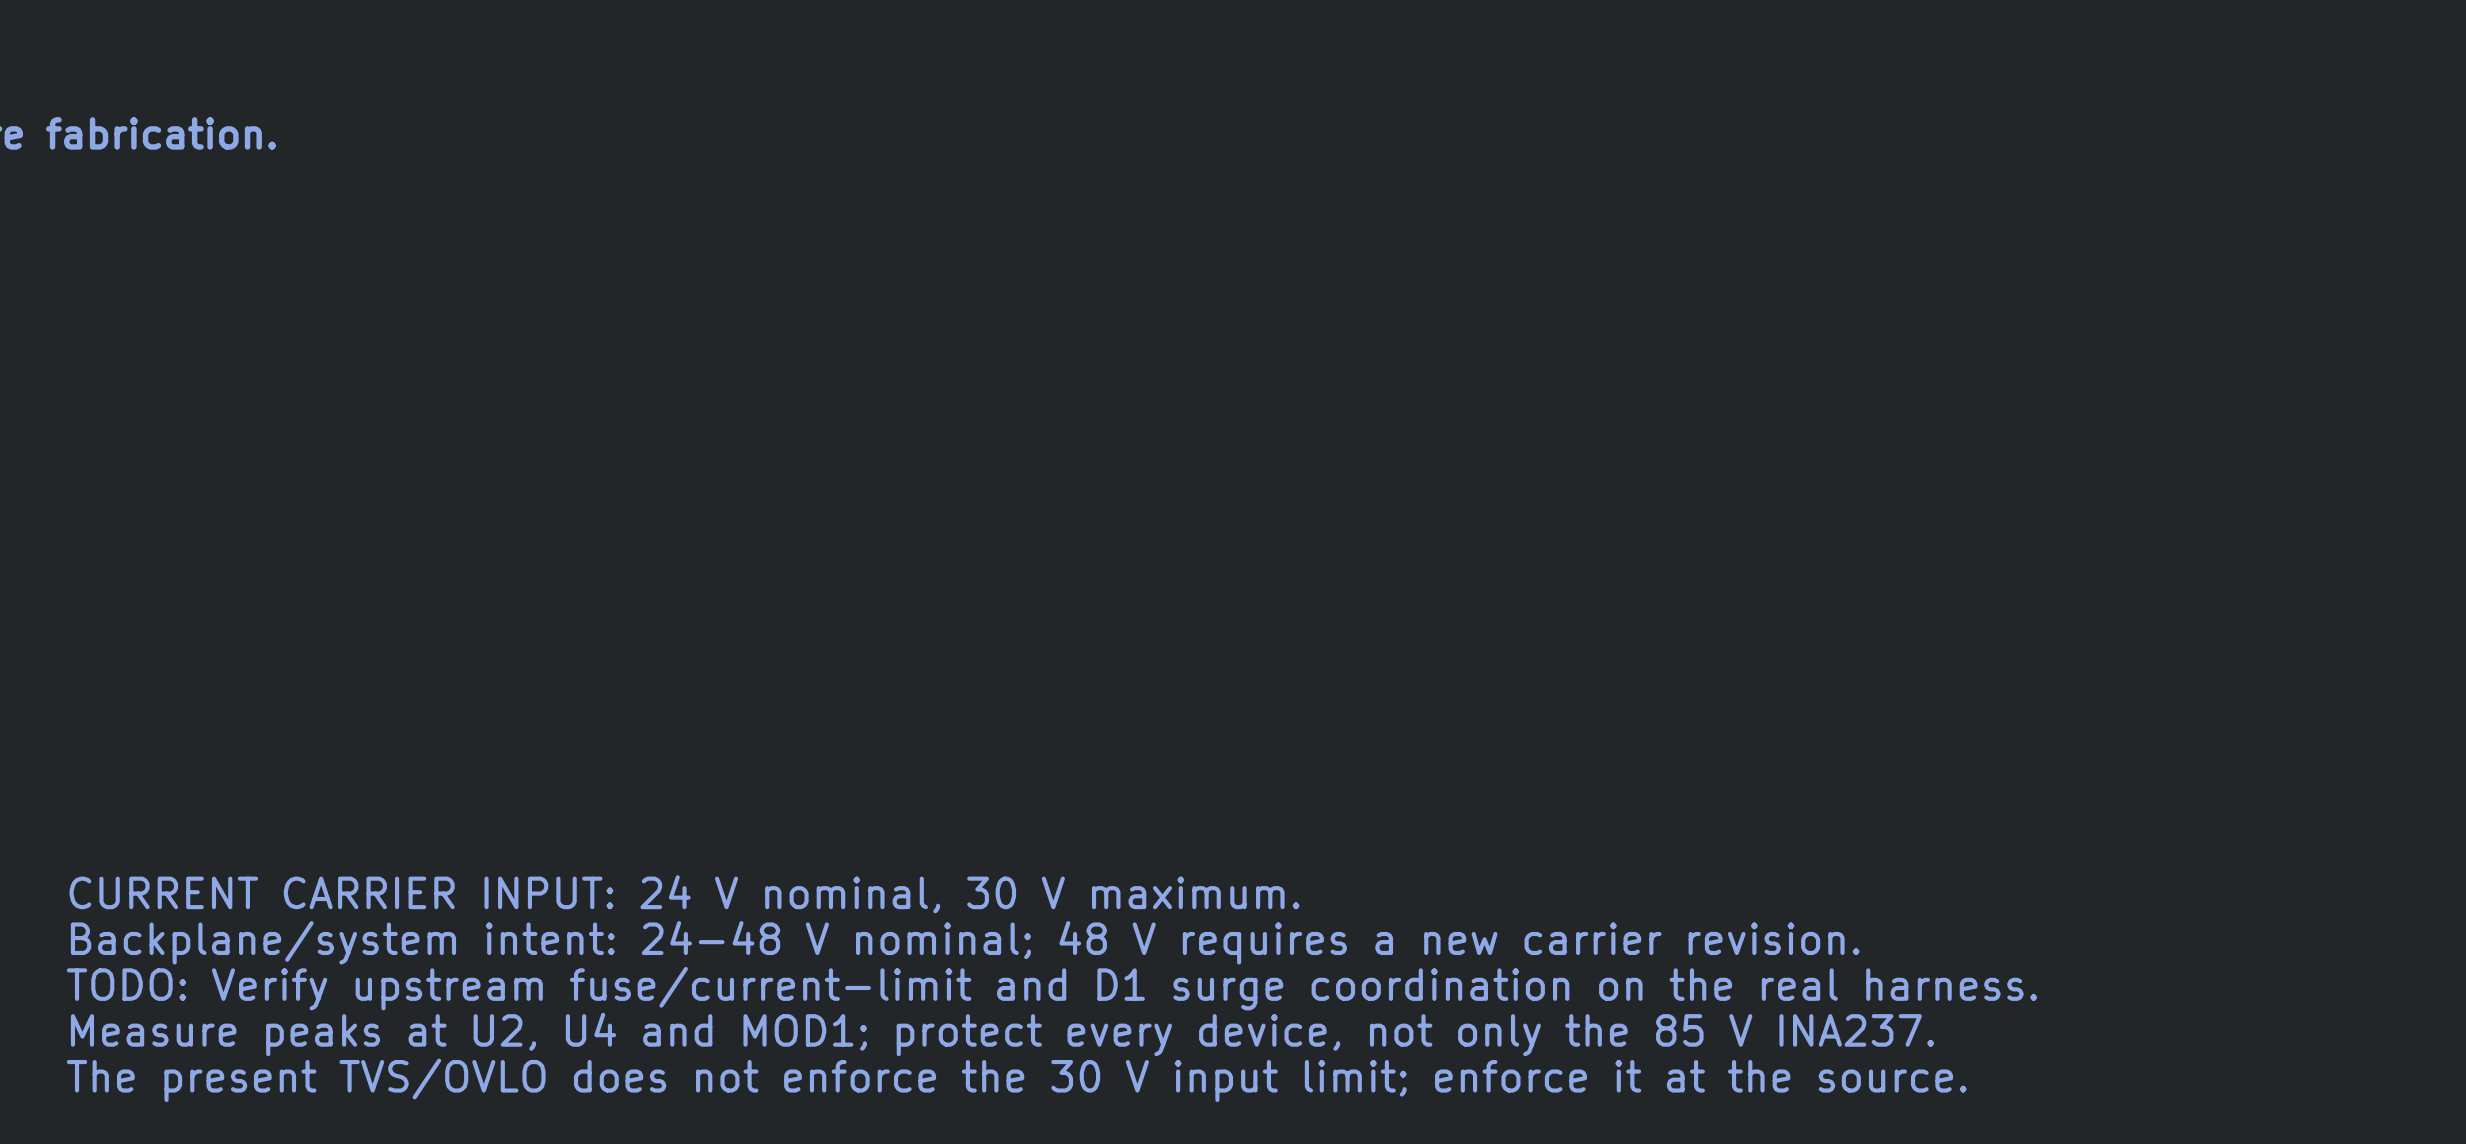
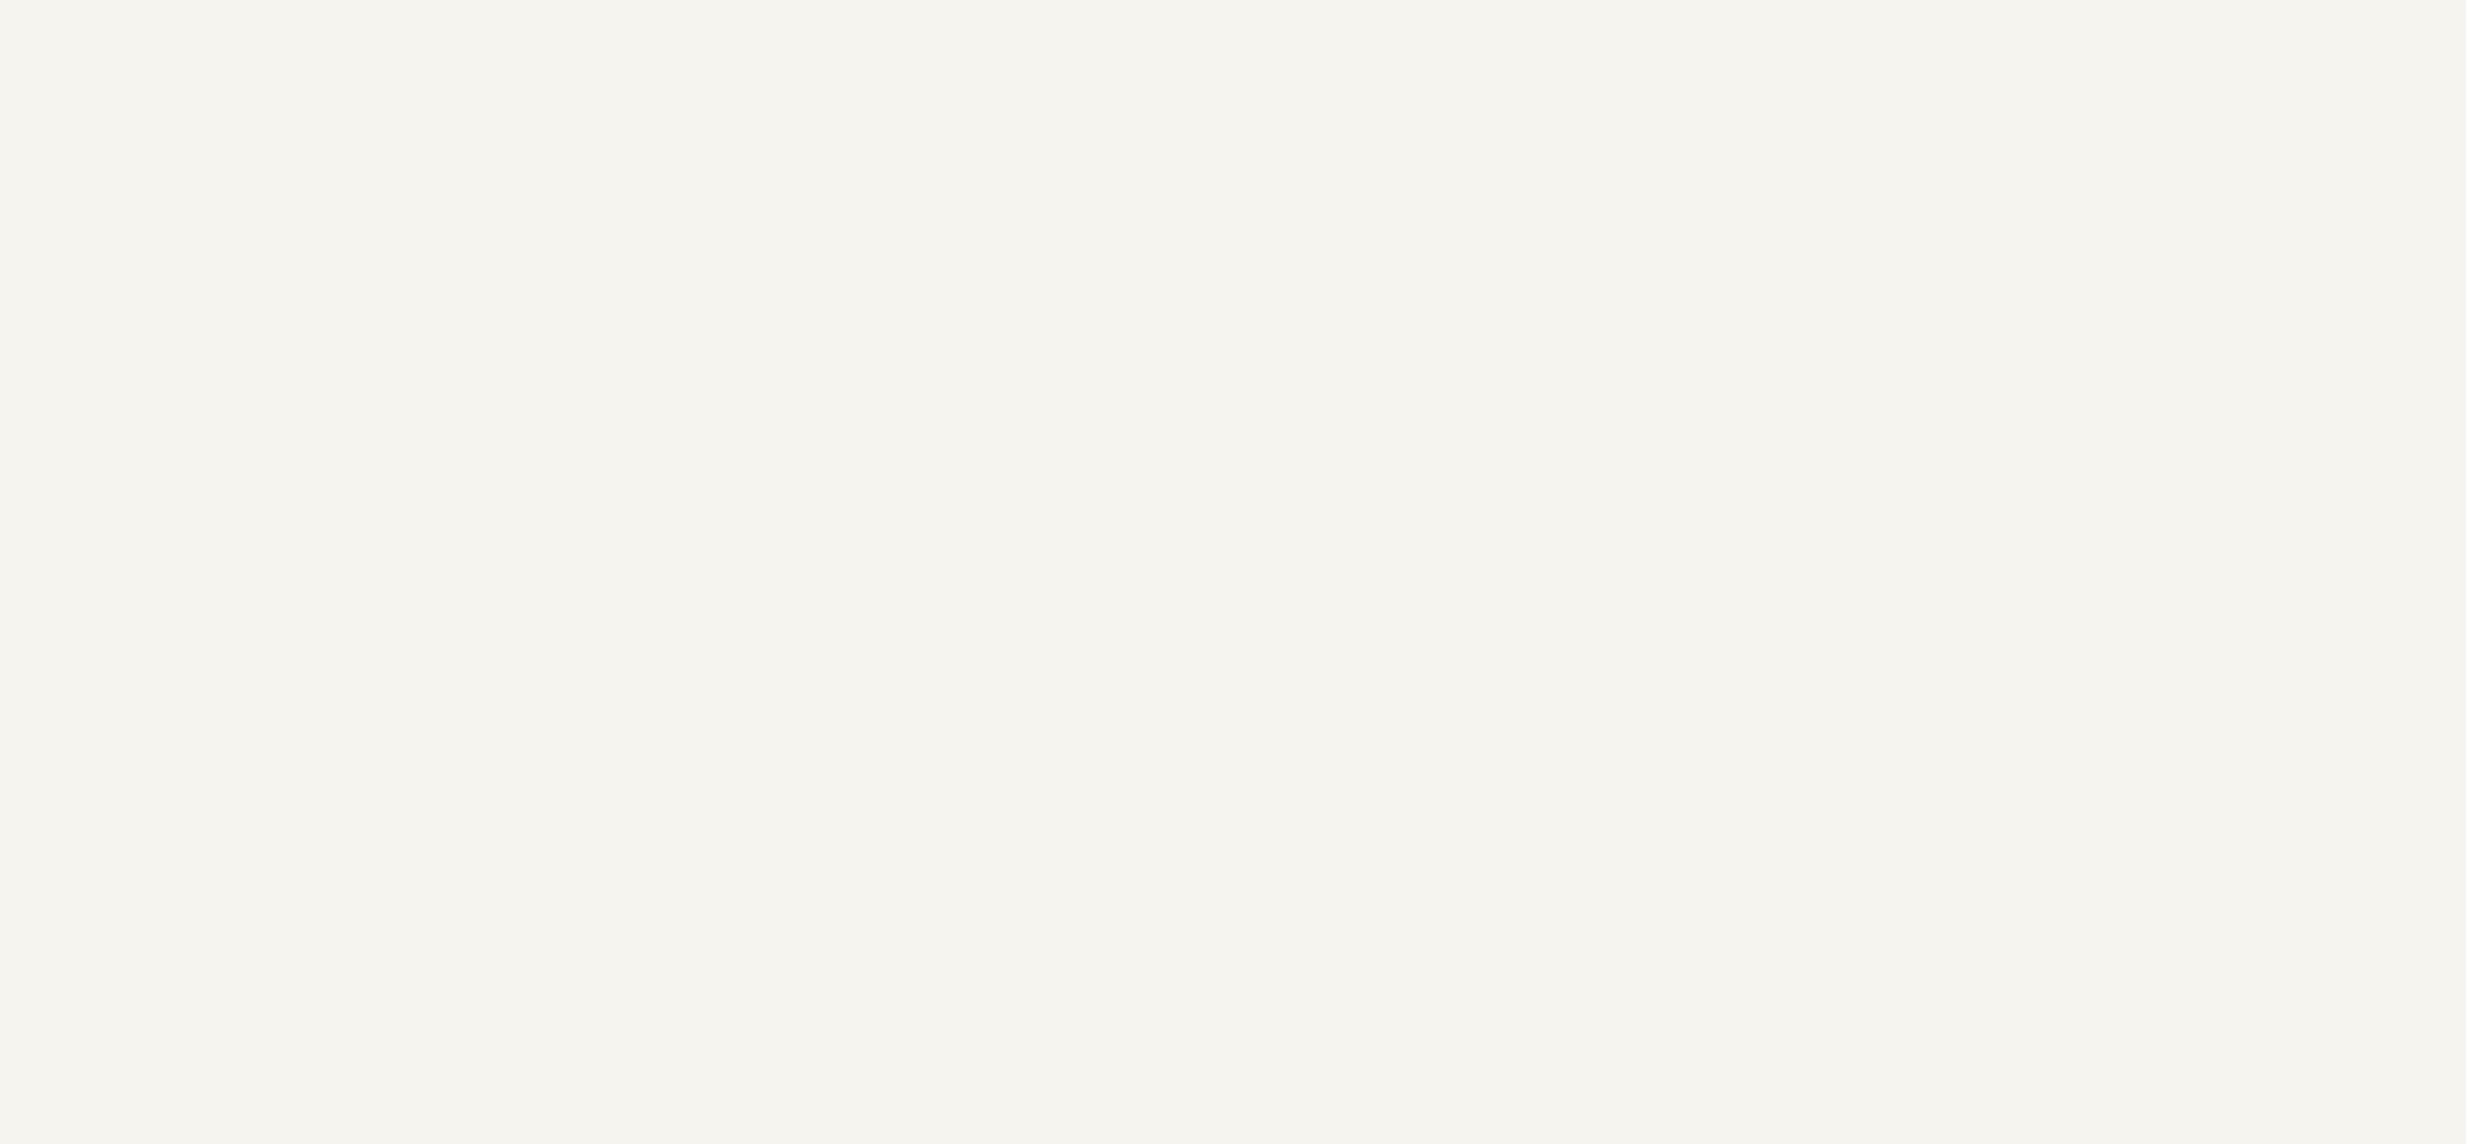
text: CURRENT CARRIER INPUT: 24 V nominal, 30 V maximum. (684, 894) -> none
text: Backplane/system intent: 24-48 V nominal; 48 V requires a new carrier revision. (965, 942) -> none
text: TODO: Verify upstream fuse/current-limit and D1 surge coordination on the real harness. (1051, 988) -> none
text: Measure peaks at U2, U4 and MOD1; protect every device, not only the 85 V INA237. (1002, 1034) -> none
text: The present TVS/OVLO does not enforce the 30 V input limit; enforce it at the source. (1016, 1080) -> none

